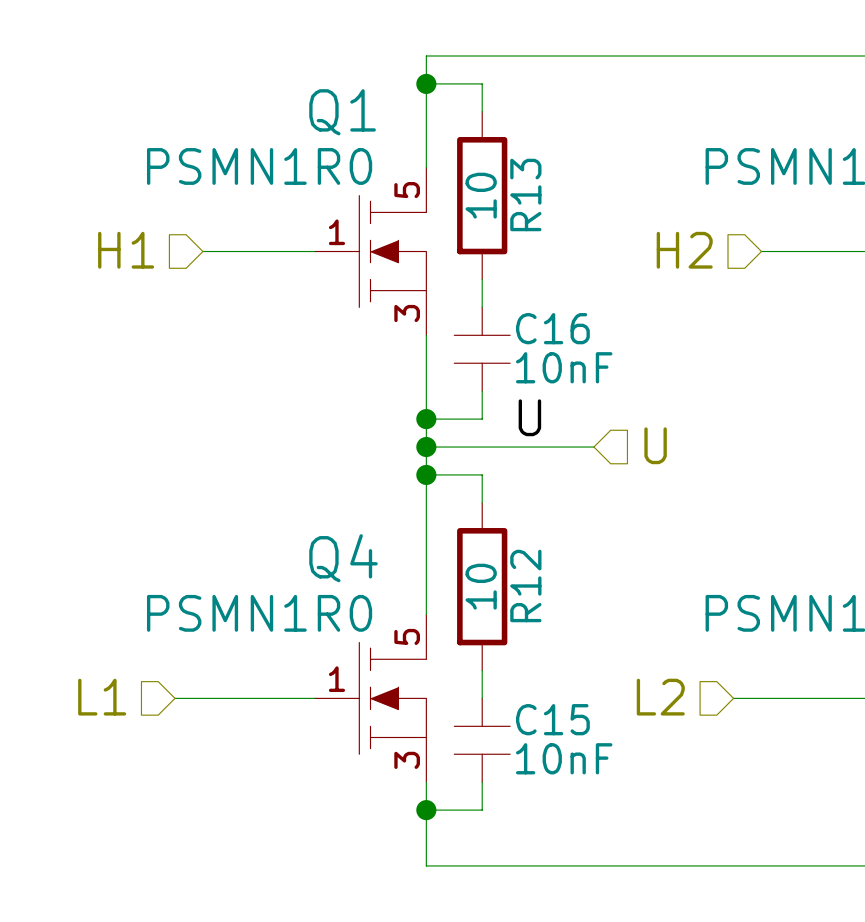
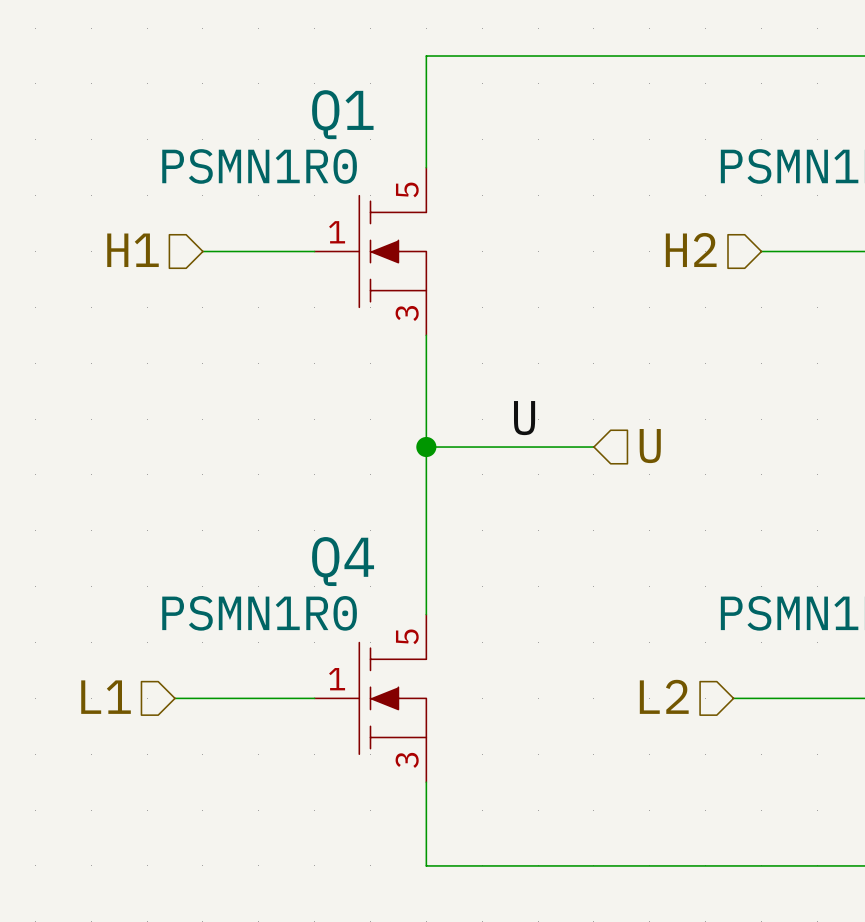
wire: (426, 83) (482, 83) (482, 111) -> none
junction: (426, 83) -> none
R13: 10 (482, 195) -> none
wire: (482, 279) (482, 307) -> none
C16: 10nF (482, 349) -> none
wire: (482, 391) (482, 419) (426, 419) -> none
junction: (426, 419) -> none
wire: (426, 474) (482, 474) (482, 502) -> none
junction: (426, 474) -> none
R12: 10 (482, 586) -> none
wire: (482, 670) (482, 698) -> none
C15: 10nF (482, 740) -> none
wire: (482, 782) (482, 810) (426, 810) -> none
junction: (426, 810) -> none

